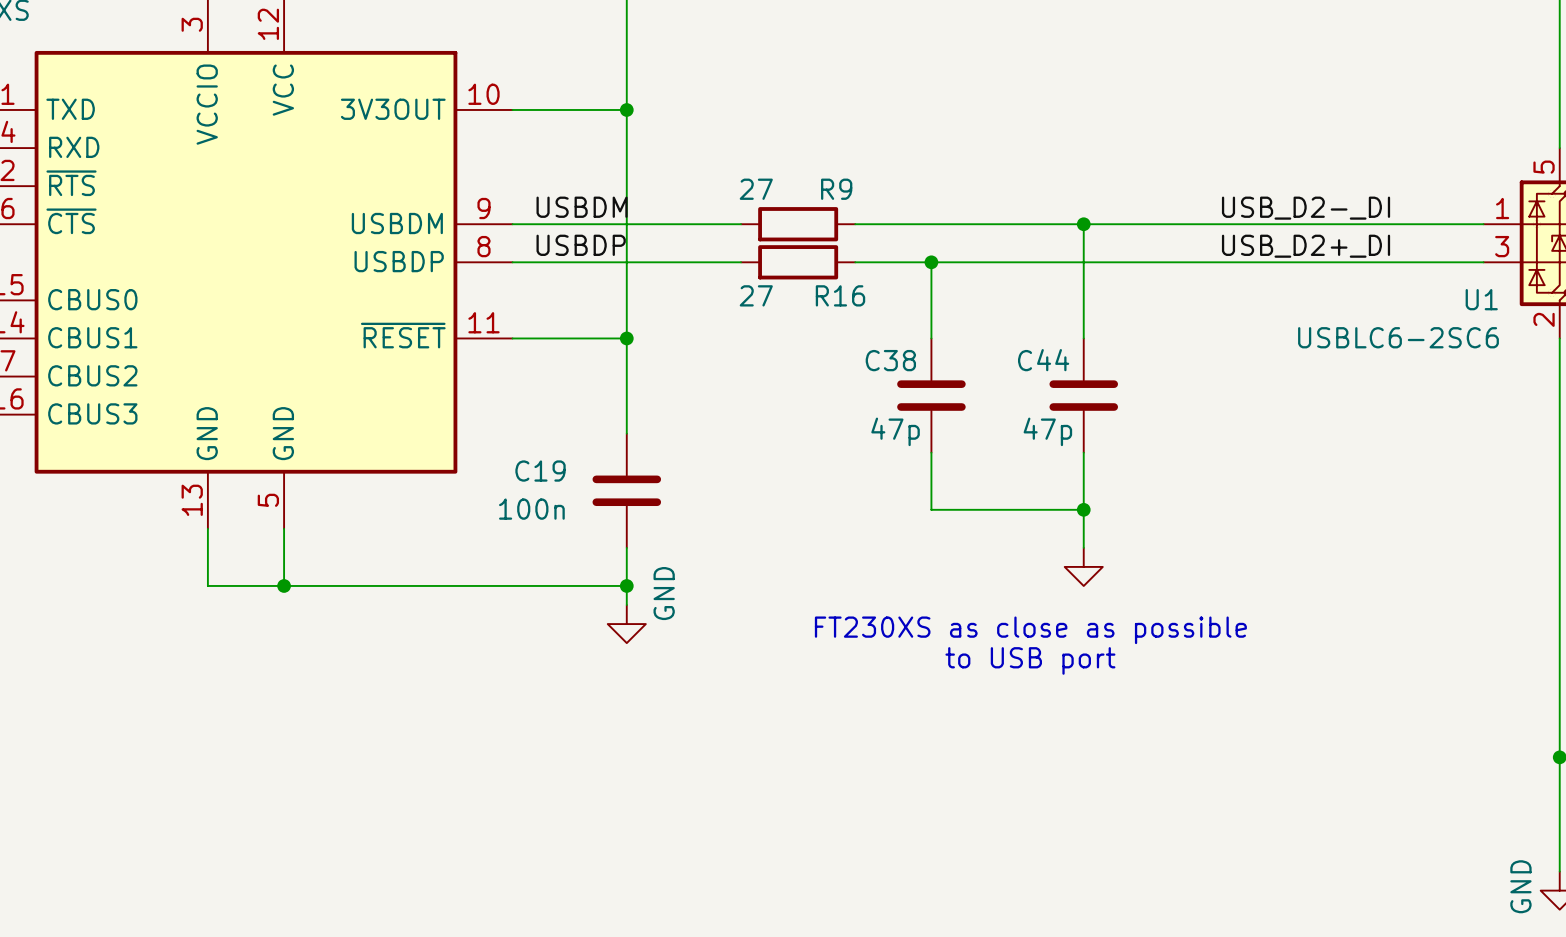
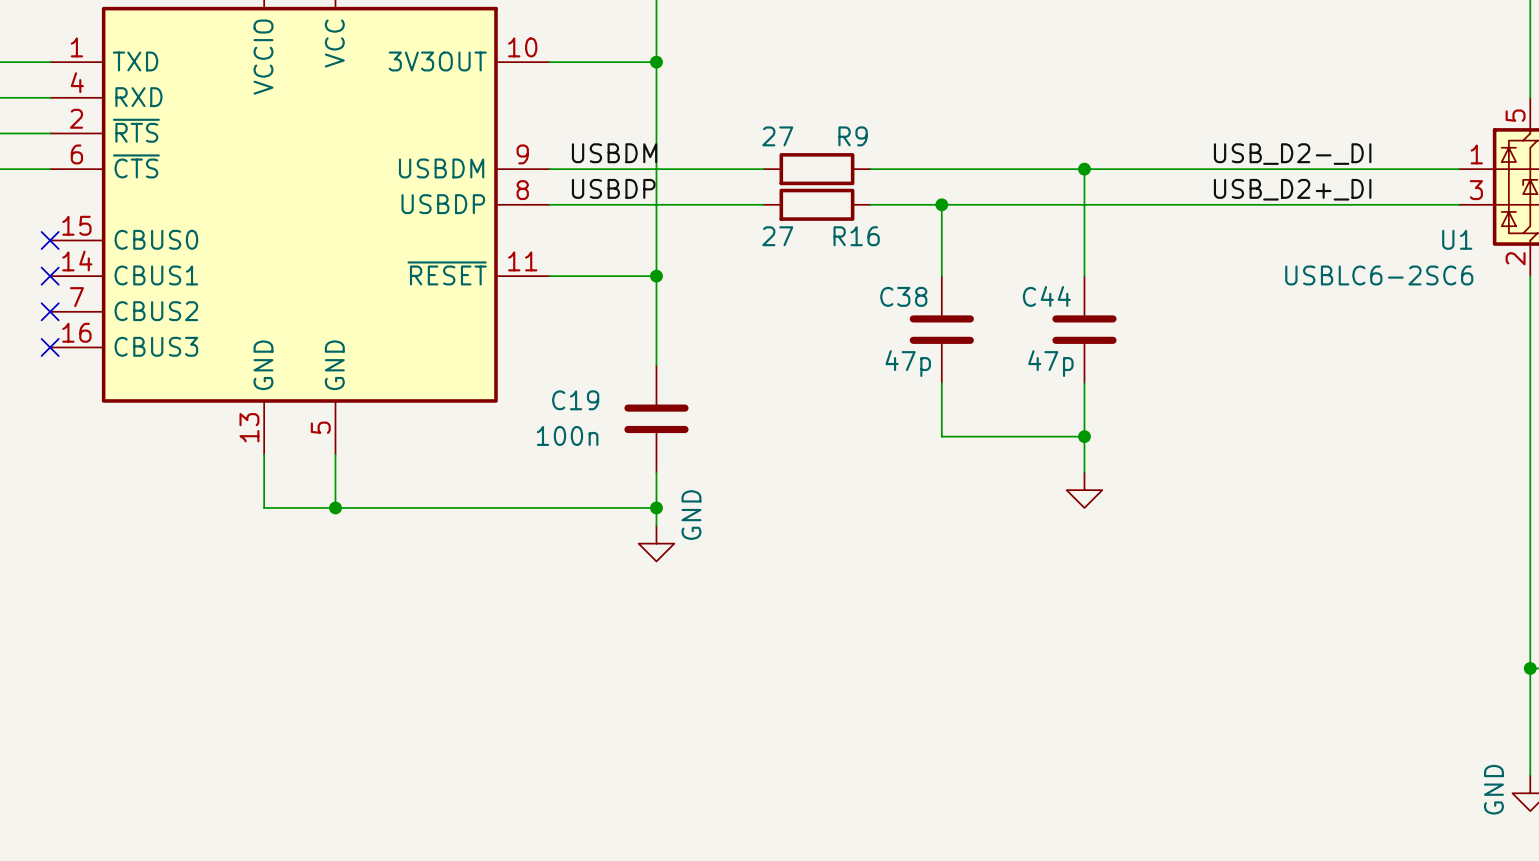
text: FT230XS as close as possible (1030, 630) -> none
text: to USB port (1030, 660) -> none

